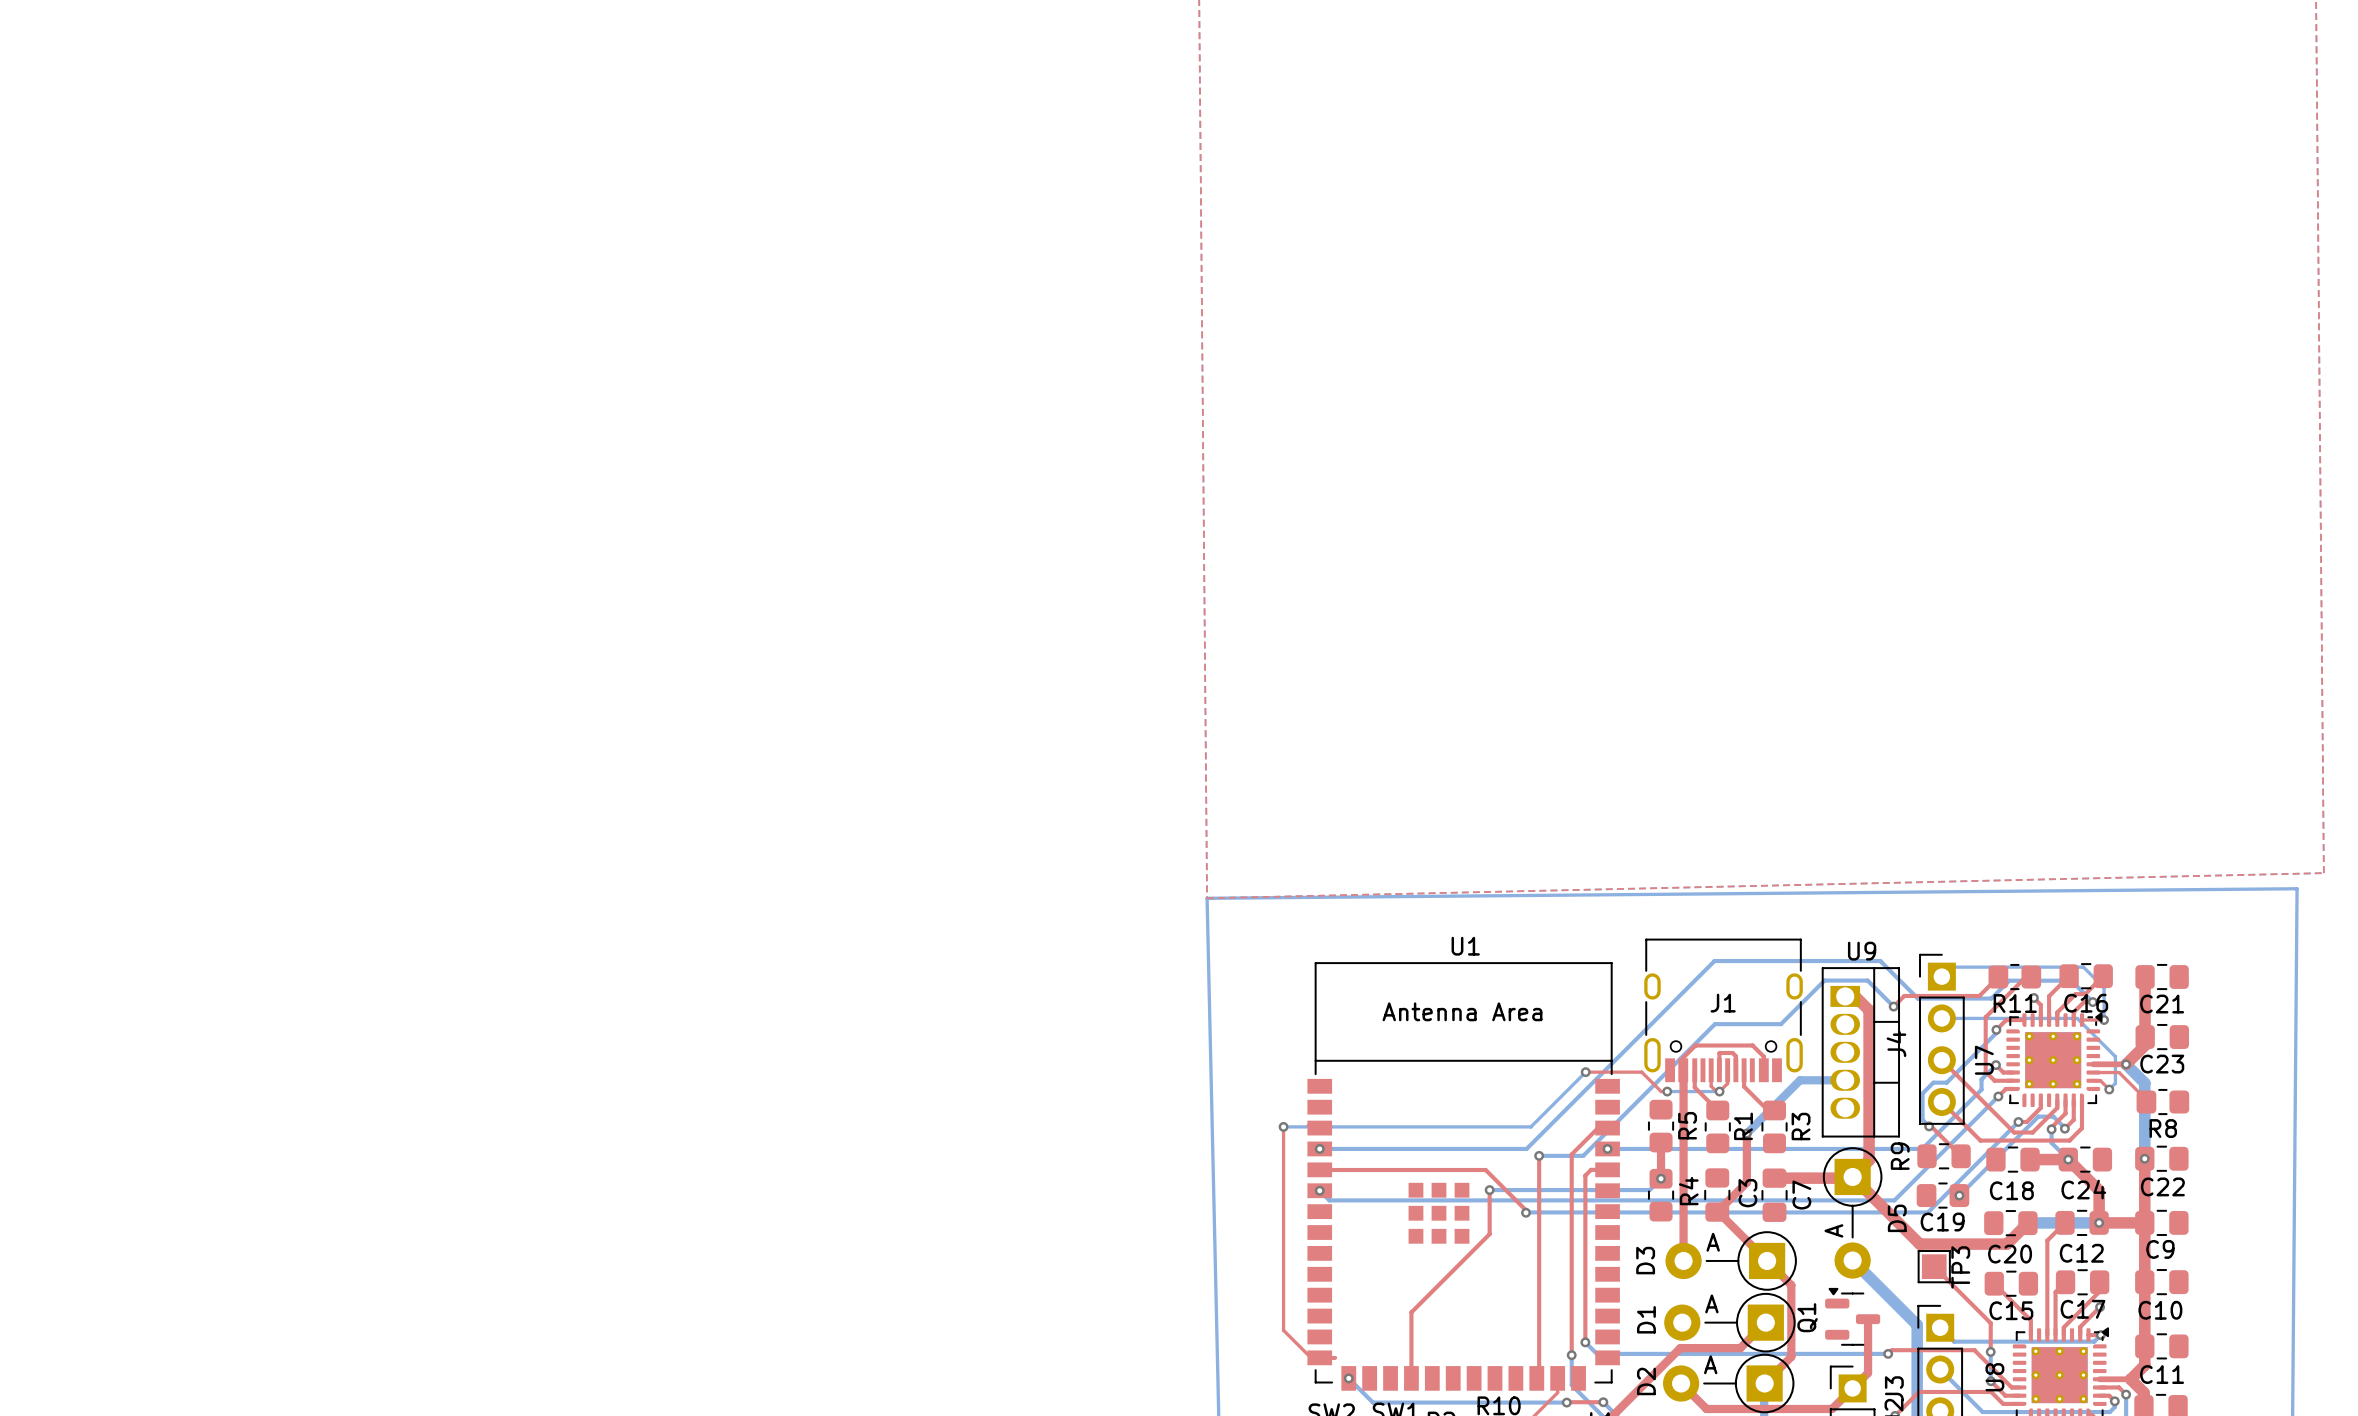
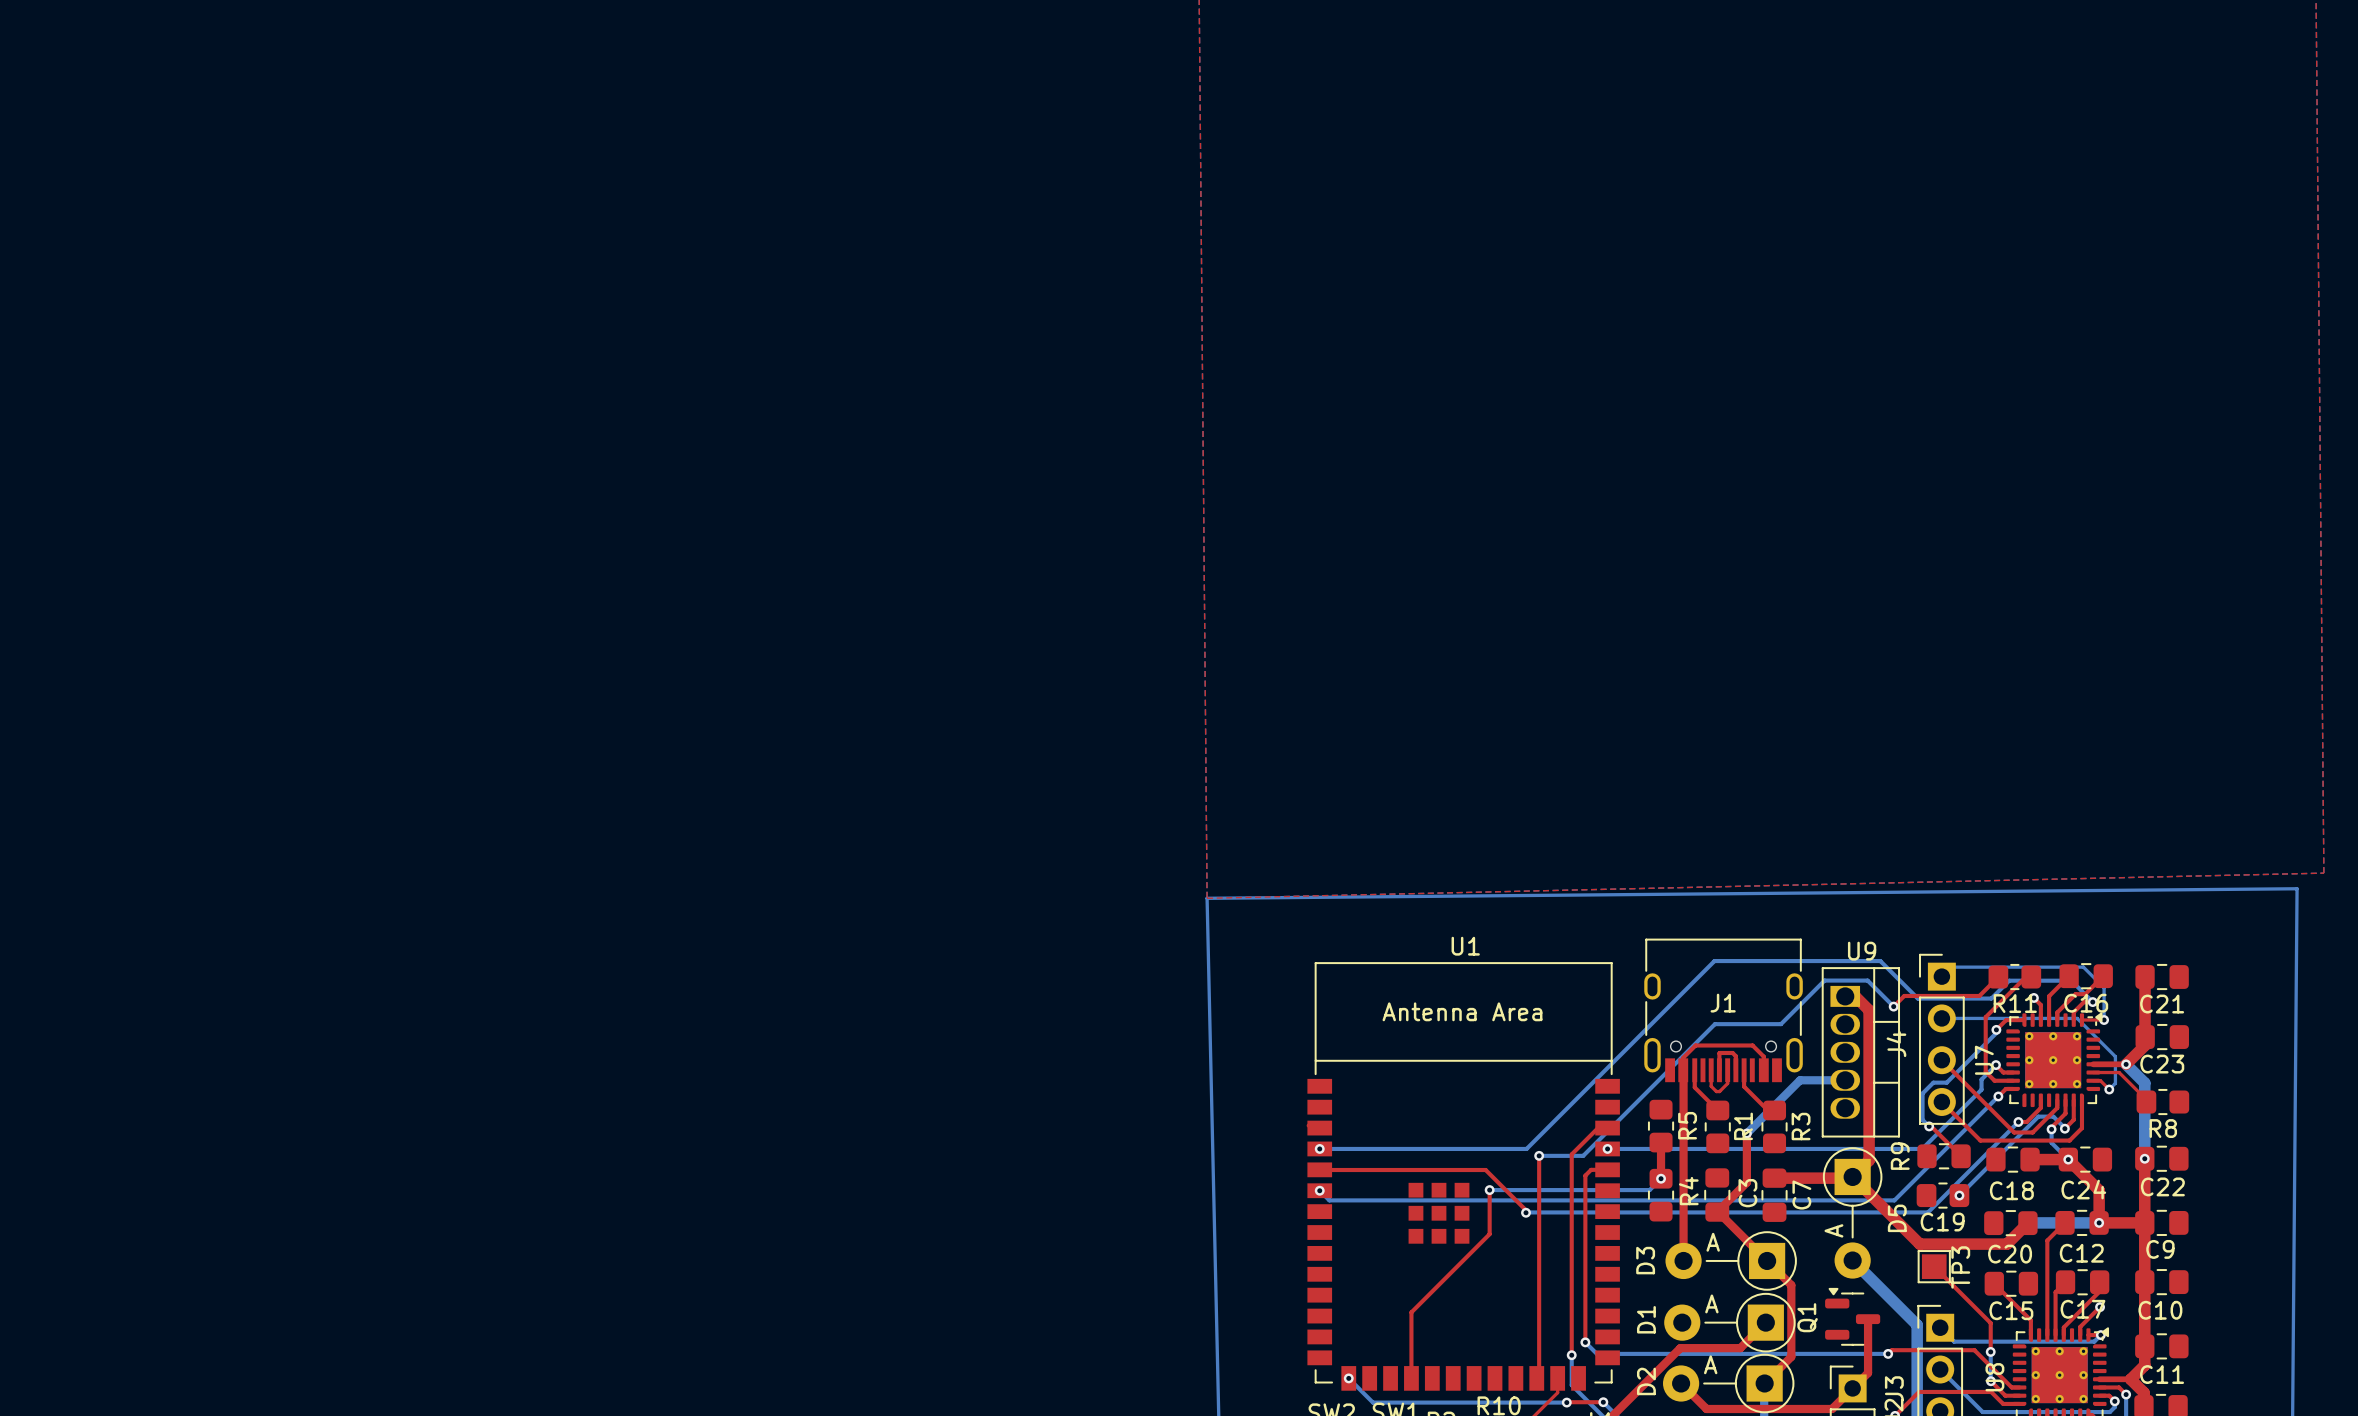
bottom track: (1585, 1072) (1530, 1126) (1283, 1126) -> none
top track: (1585, 1072) (1641, 1072) (1661, 1091) (1667, 1091) -> none
via: (1585, 1072) -> none
bottom track: (1667, 1091) (1719, 1091) -> none
via: (1667, 1091) -> none
via: (1719, 1091) -> none
top track: (1283, 1126) (1283, 1330) (1311, 1357) (1335, 1357) -> none
via: (1283, 1126) -> none

